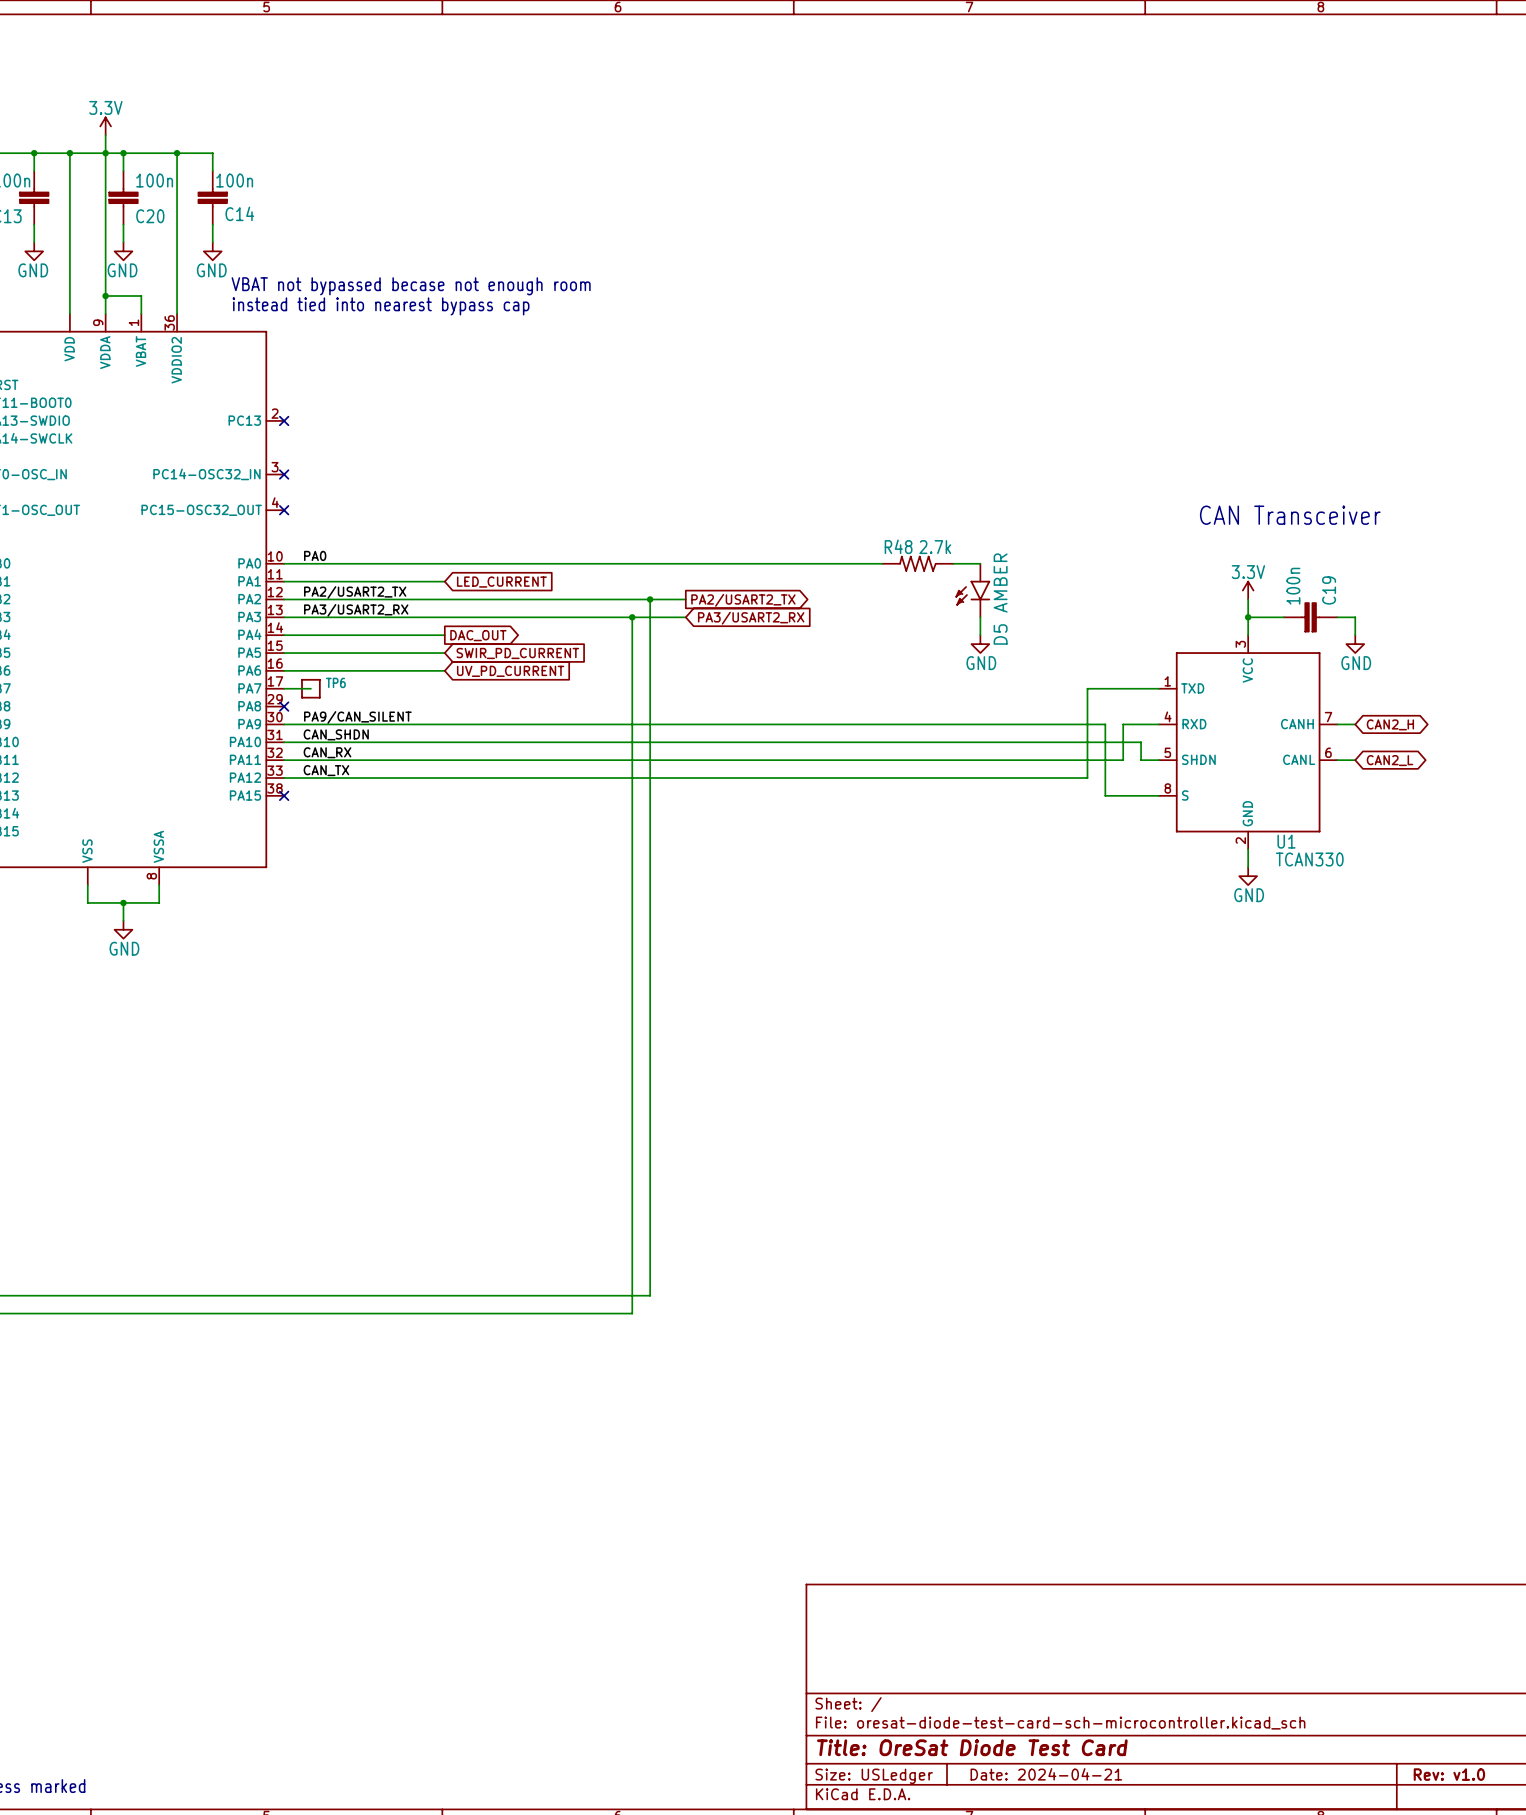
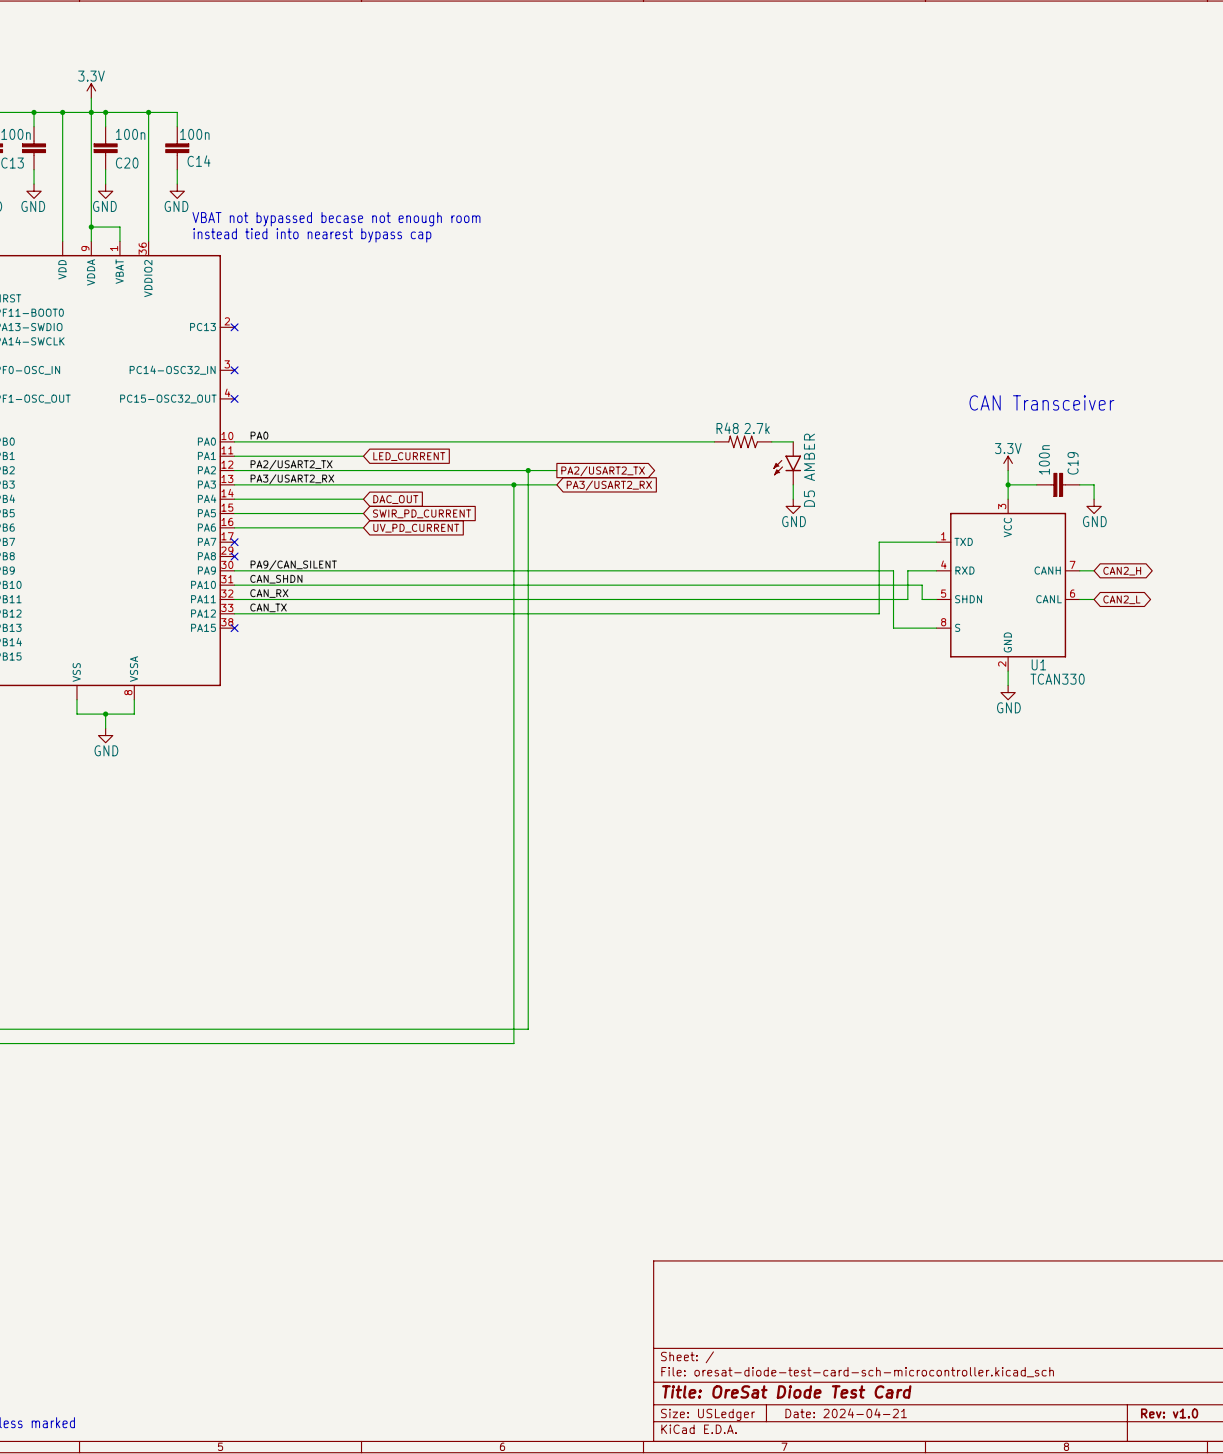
global label shape: output (478, 635) -> input (395, 499)
wire: (284, 688) (310, 688) -> none
no-connect mark: none -> (234, 542)
TP6: (310, 688) -> none

